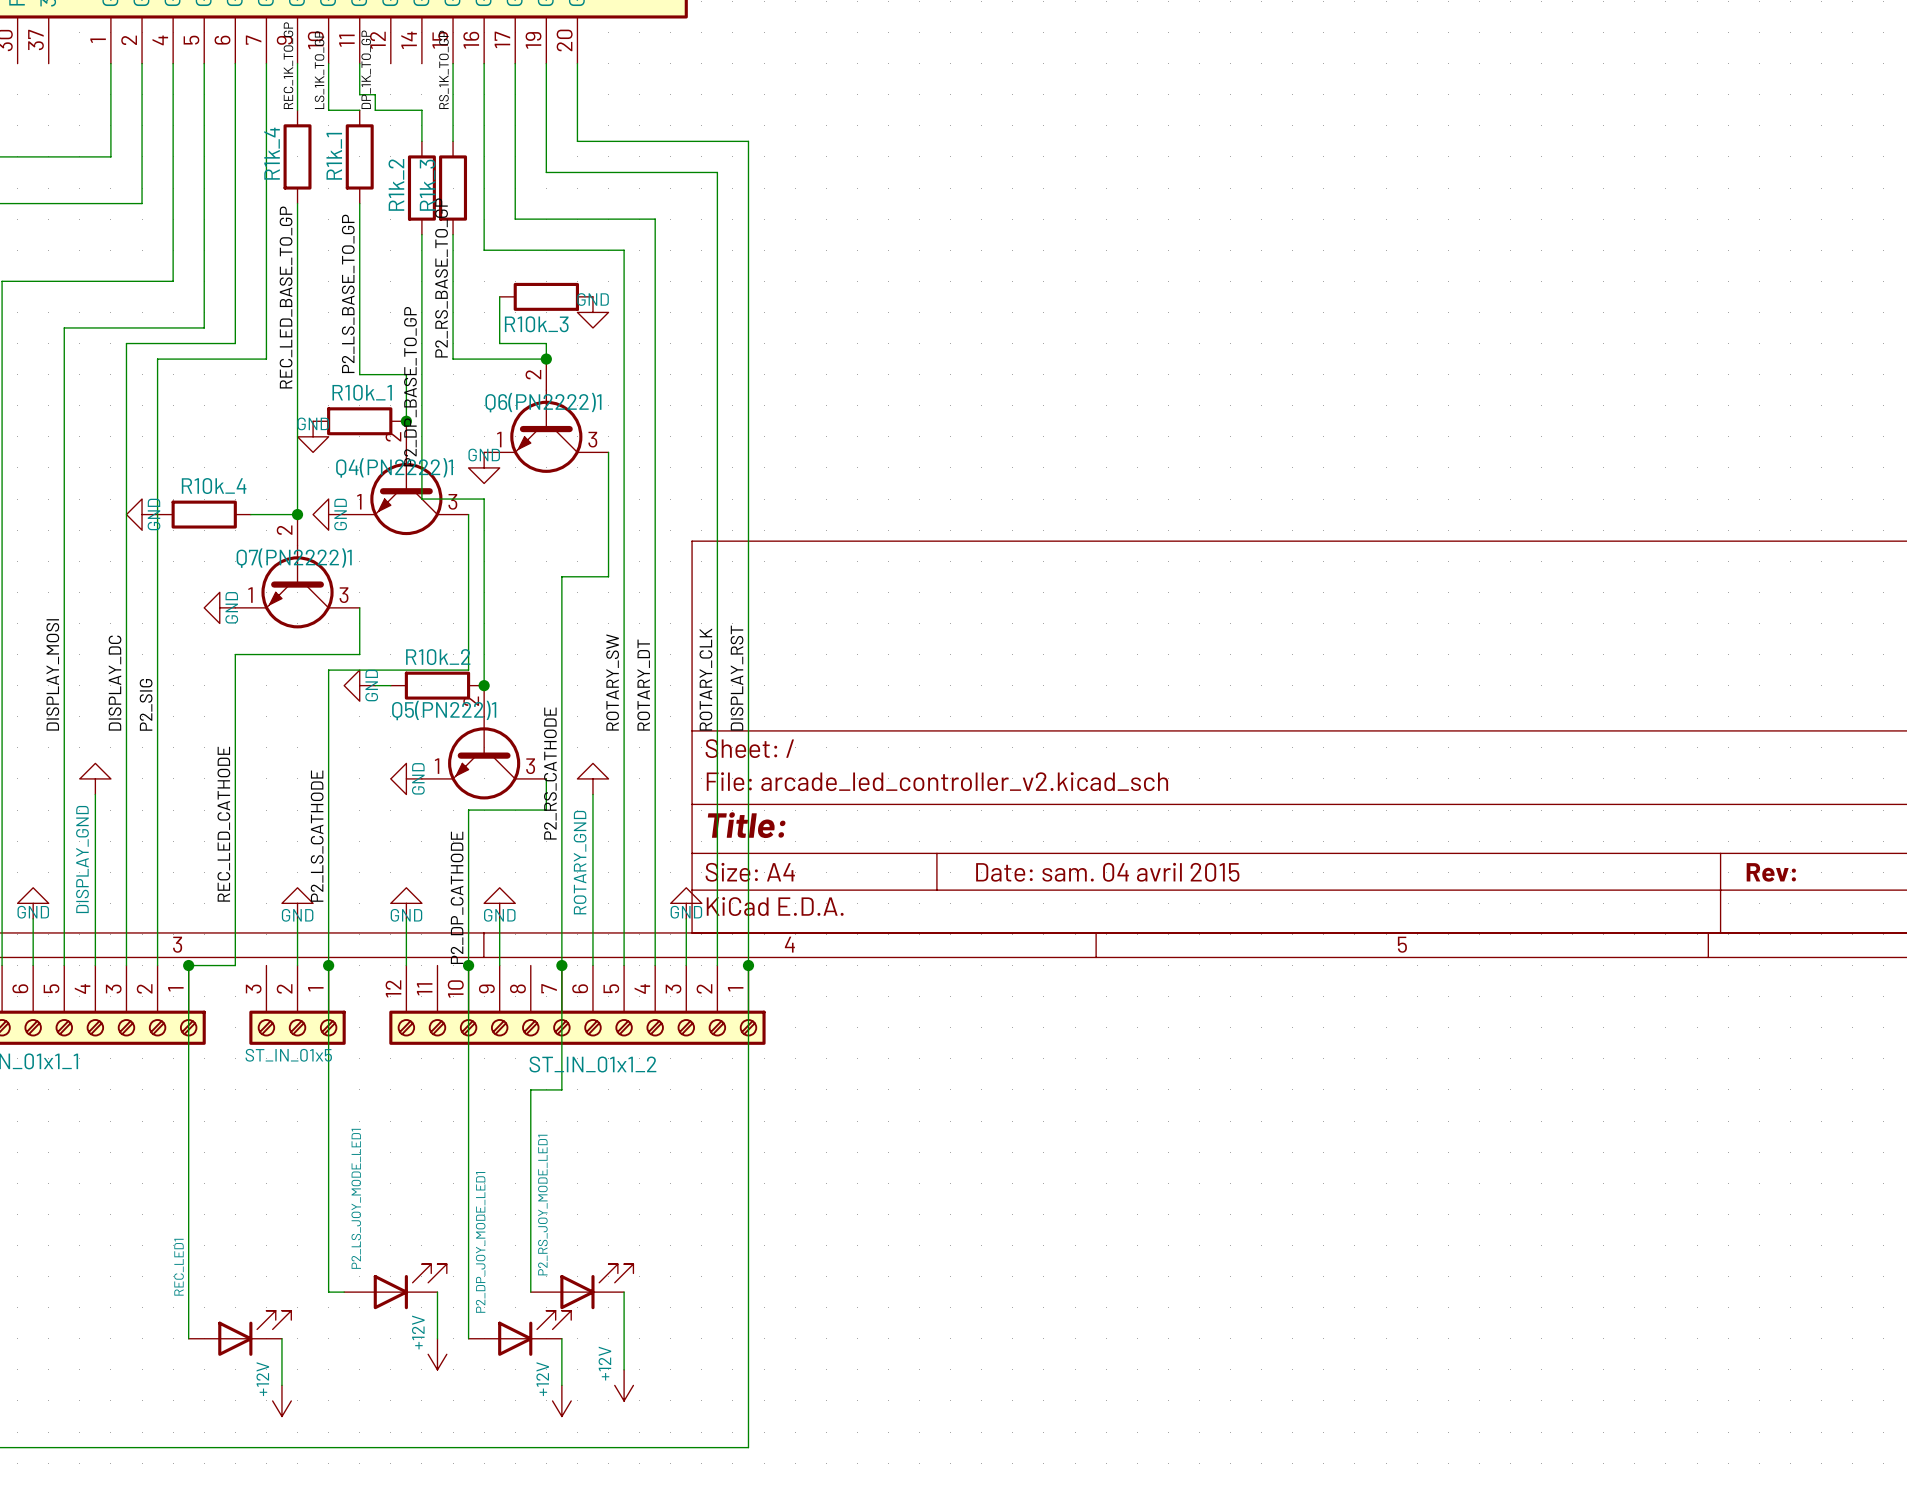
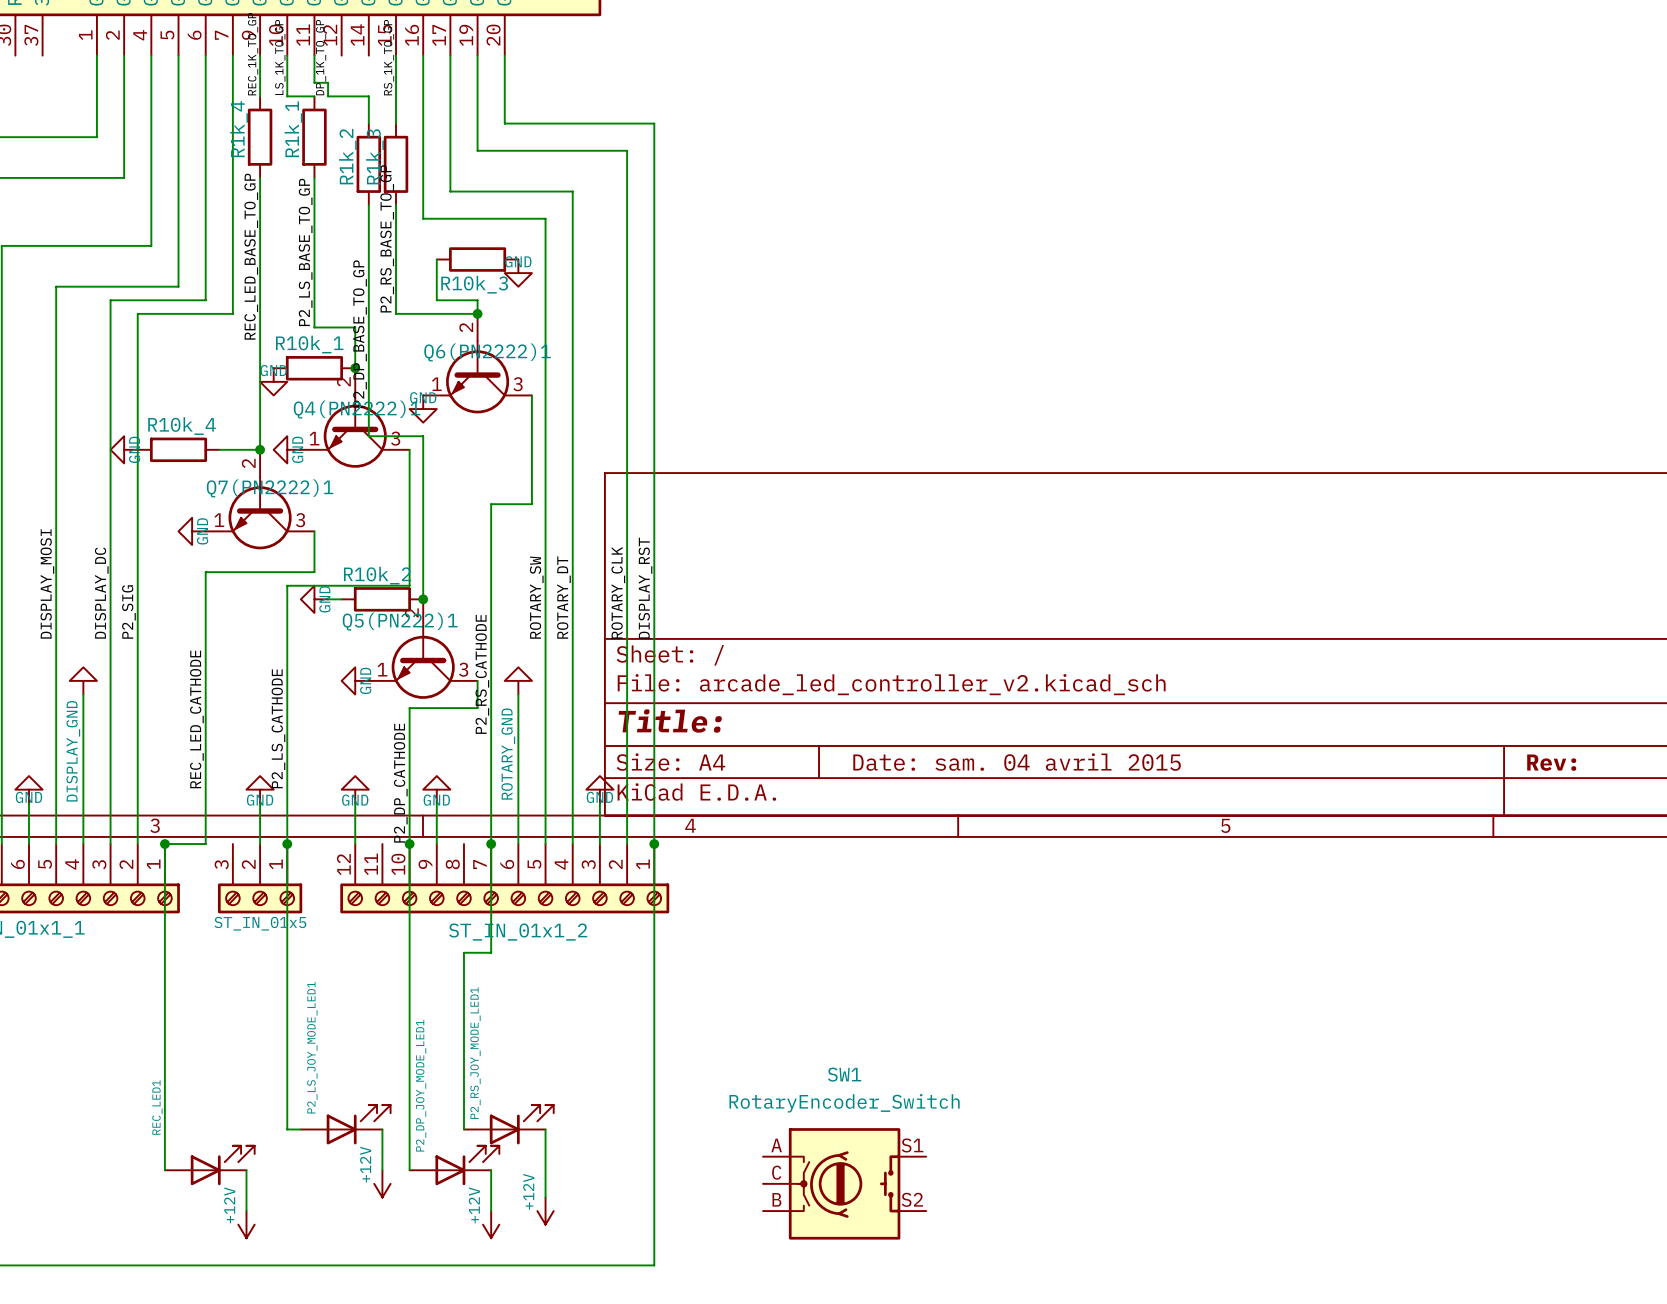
SW1: none -> RotaryEncoder_Switch (844, 1183)

